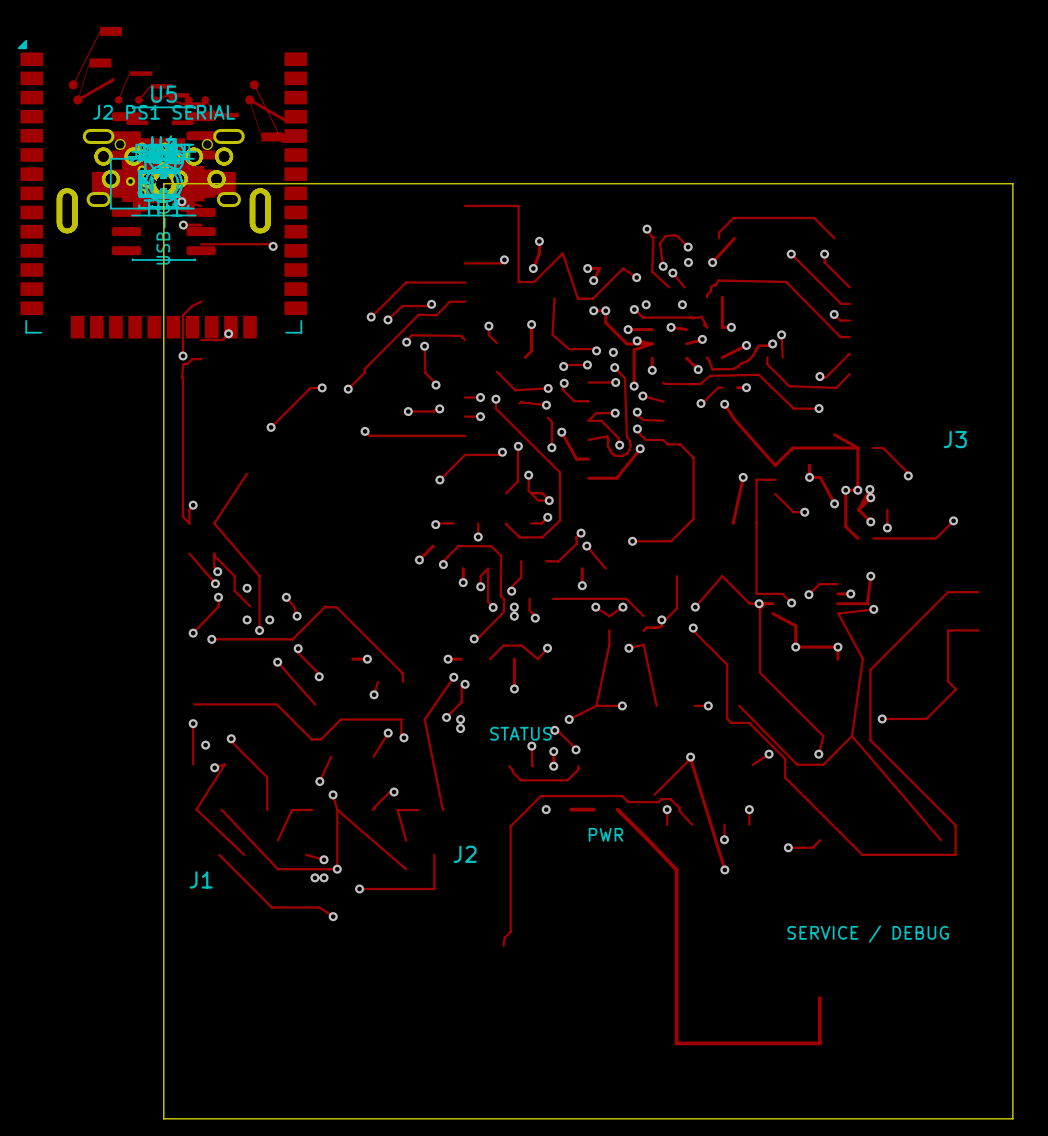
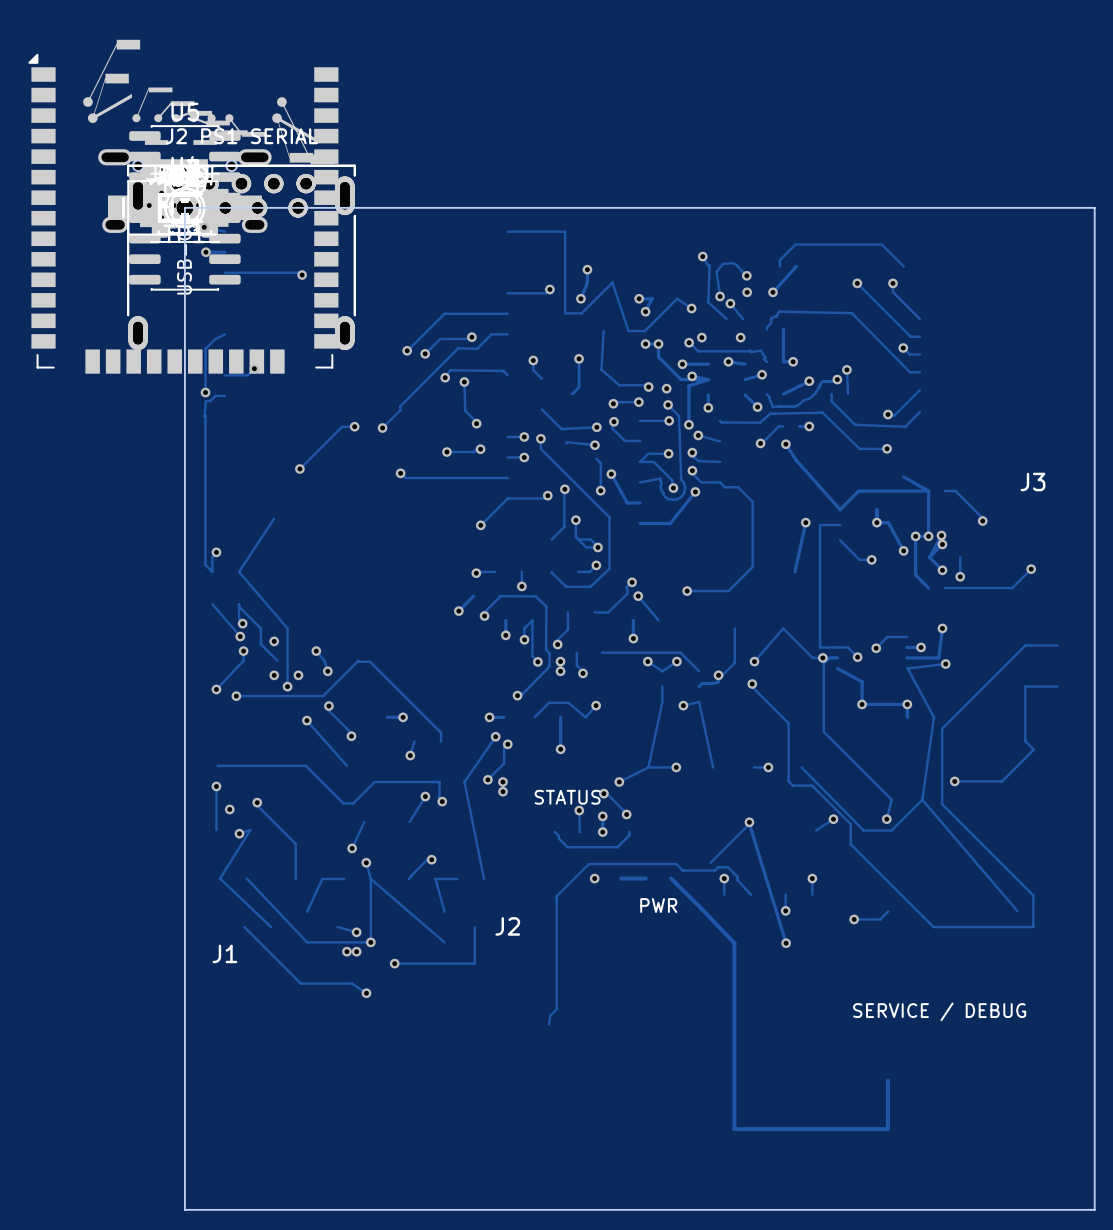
part: (163, 190) -> none
part: (163, 190) -> none
part: none -> (239, 257)
part: none -> (239, 257)

